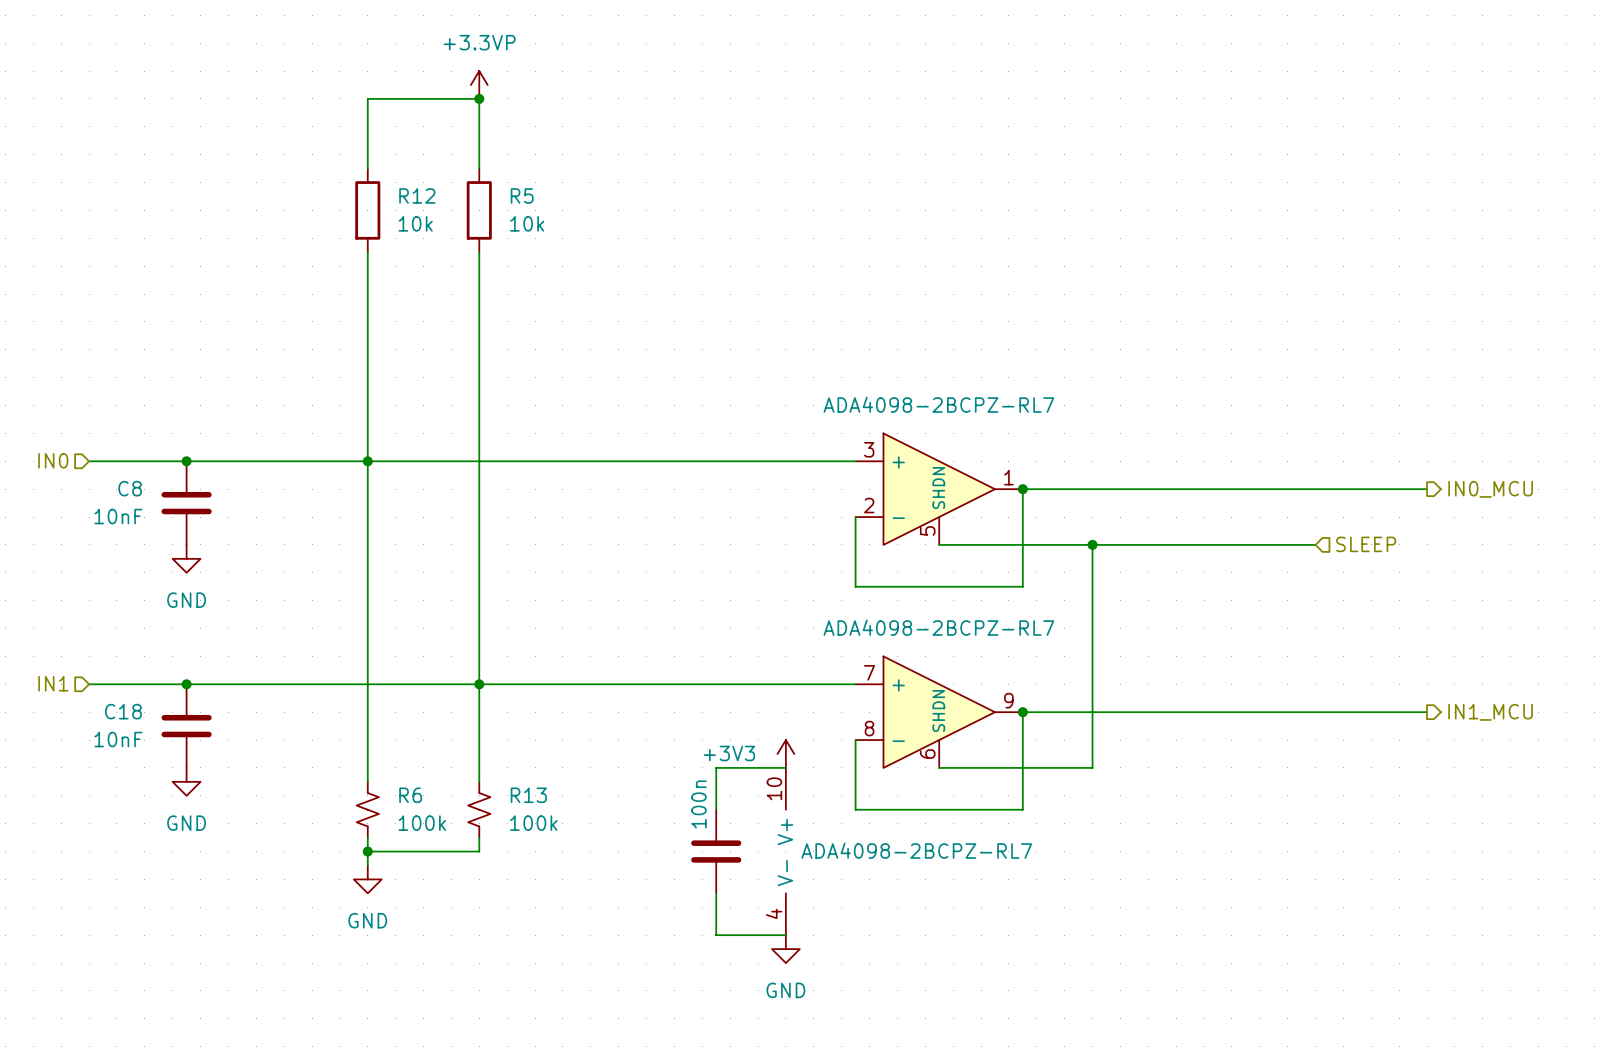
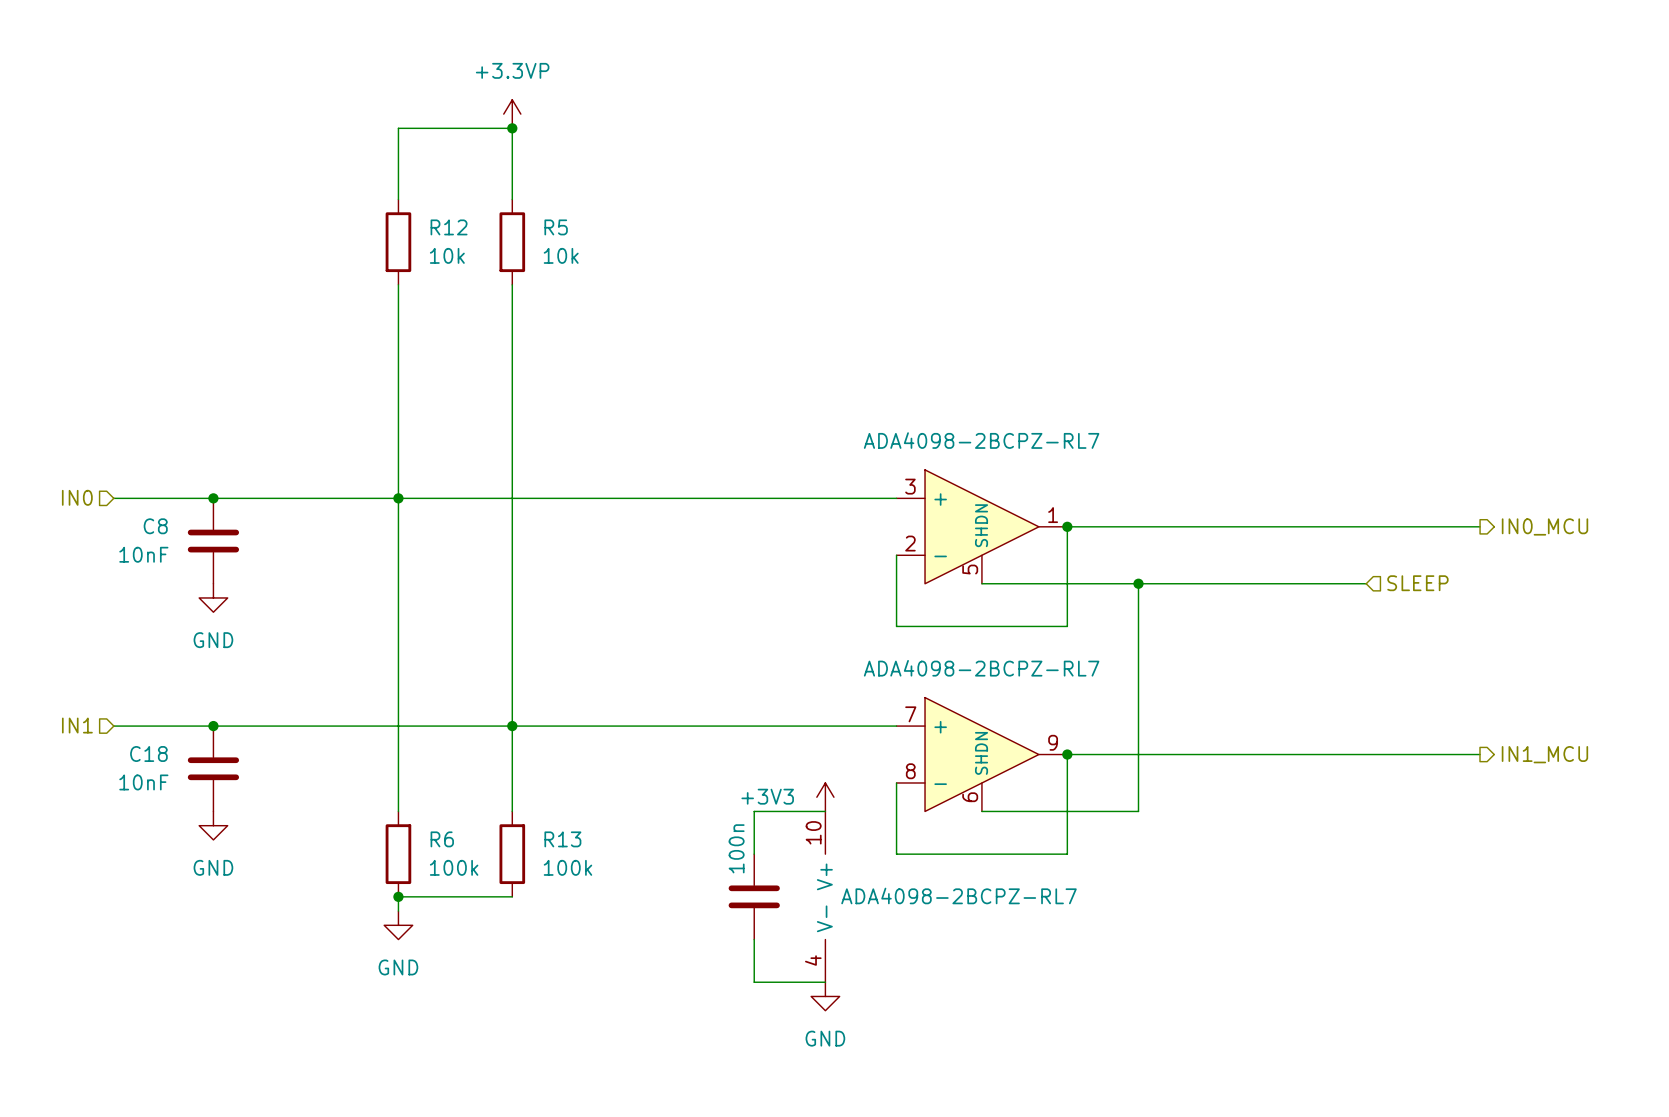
R6 symbol: [356, 781, 379, 838] -> [385, 811, 412, 897]
R13 symbol: [468, 781, 491, 838] -> [499, 811, 526, 897]

